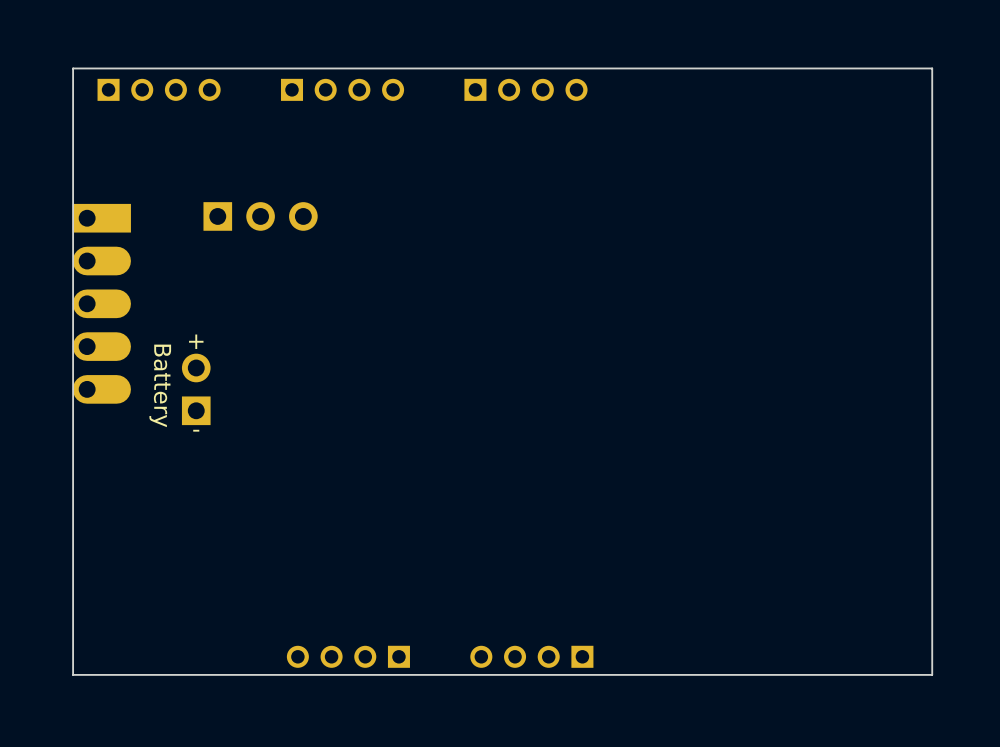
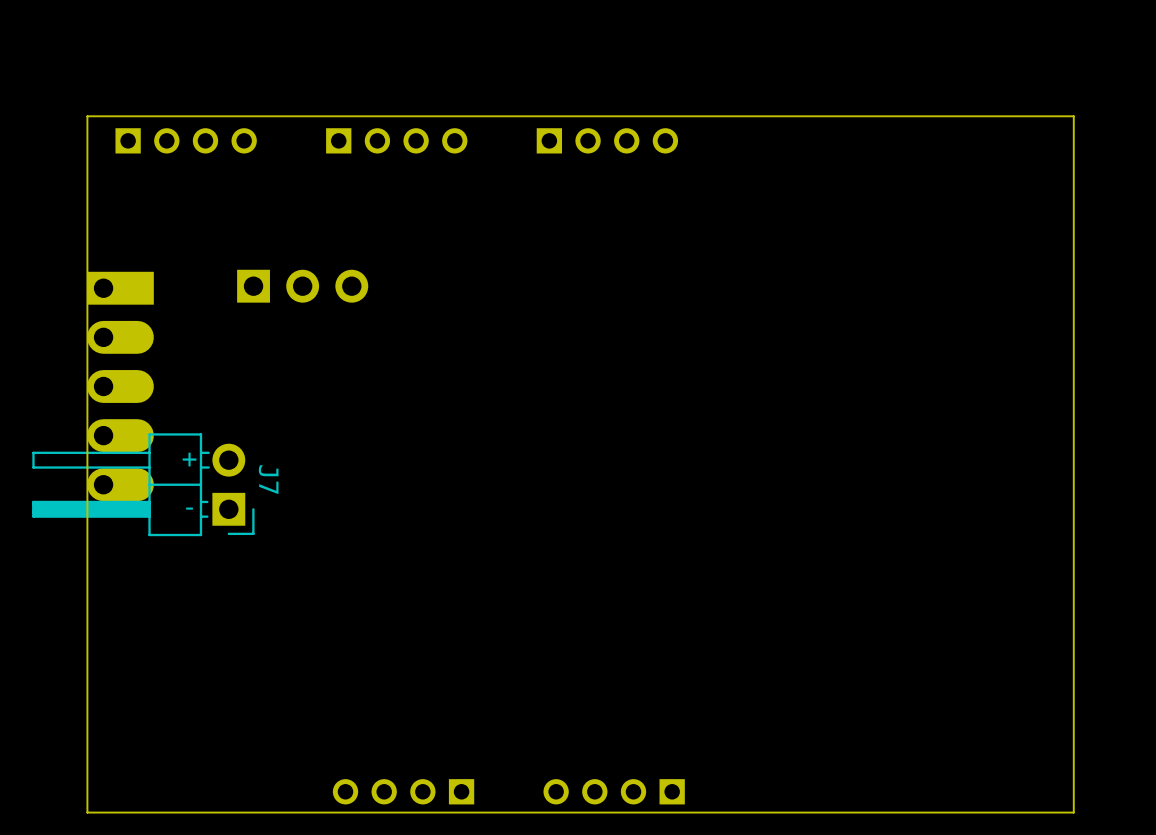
Battery name: Battery (160, 385) -> J7 (268, 479)
Battery side: top (196, 389) -> bottom (143, 484)

